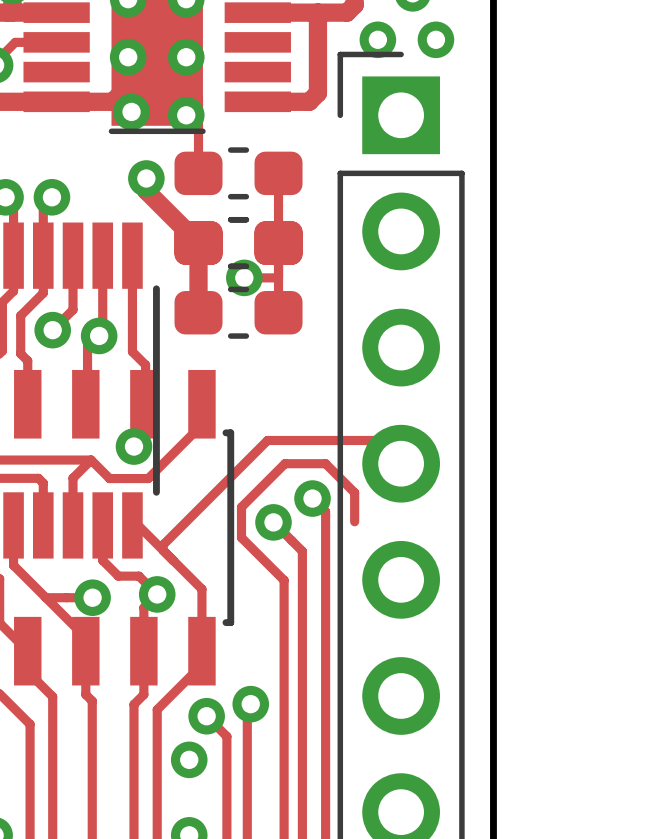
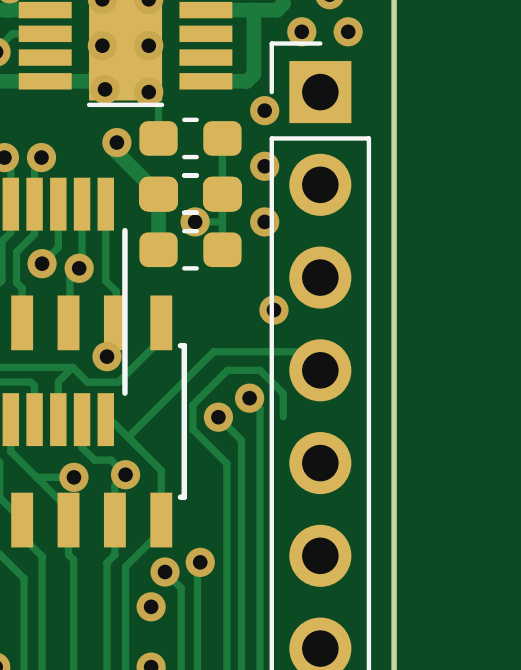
via: none -> (264, 110)
via: none -> (264, 166)
via: none -> (264, 221)
via: none -> (273, 310)

